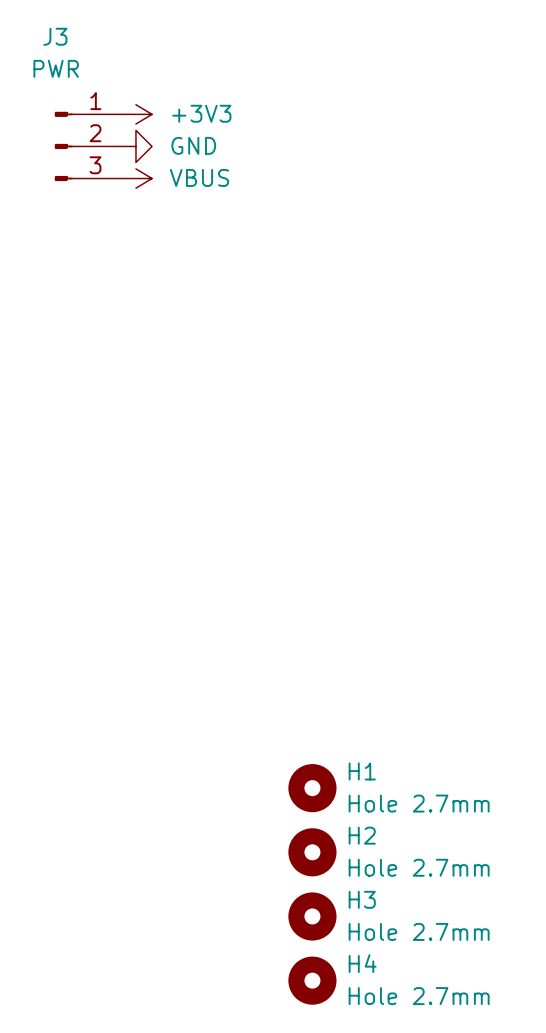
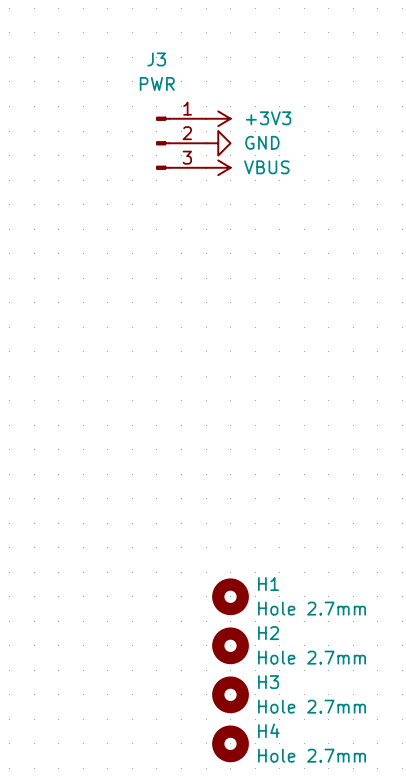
power symbol position: +3V3 (135, 114) -> +3V3 (218, 118)
J3 position: (87, 146) -> (181, 143)
power symbol position: GND (135, 146) -> GND (218, 143)
power symbol position: VBUS (135, 178) -> VBUS (218, 167)

